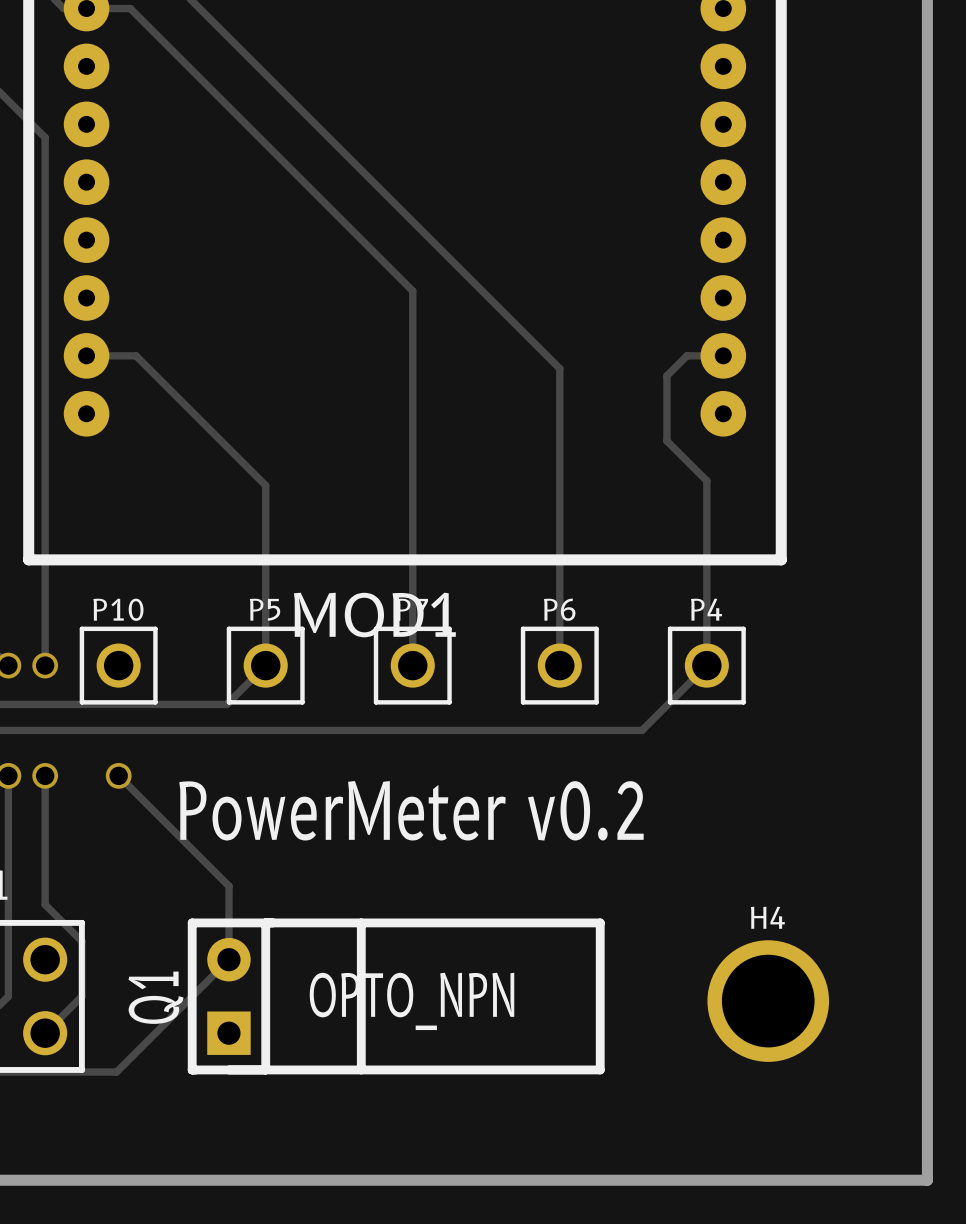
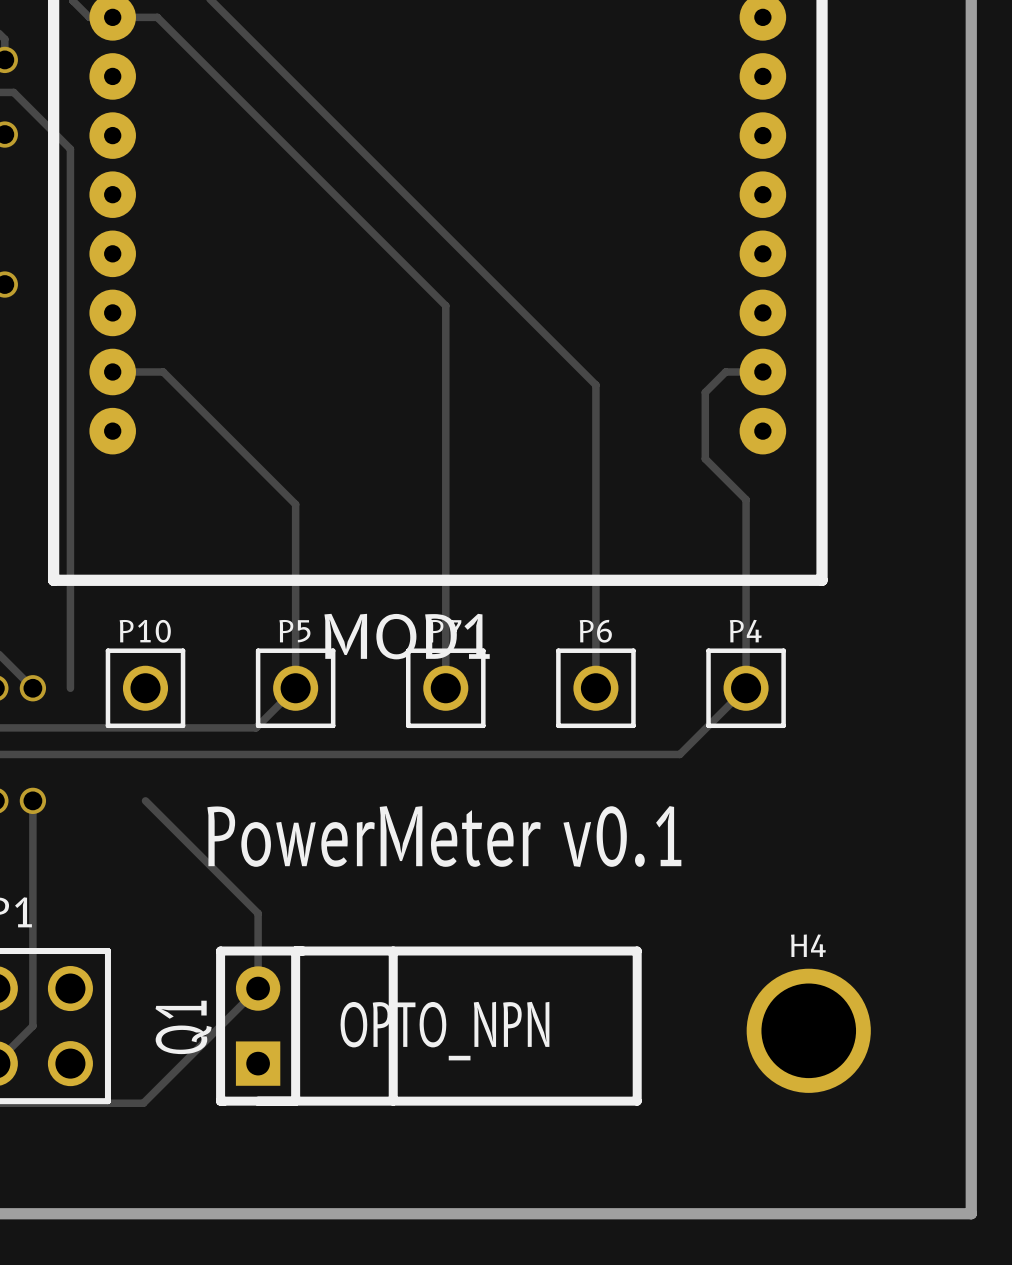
via: (45, 665) -> none
track: (45, 775) (45, 904) (81, 941) (81, 996) (45, 1033) -> none
via: (45, 775) -> none
via: (118, 775) -> none
text: PowerMeter v0.2 (411, 810) -> PowerMeter v0.1 (444, 836)

